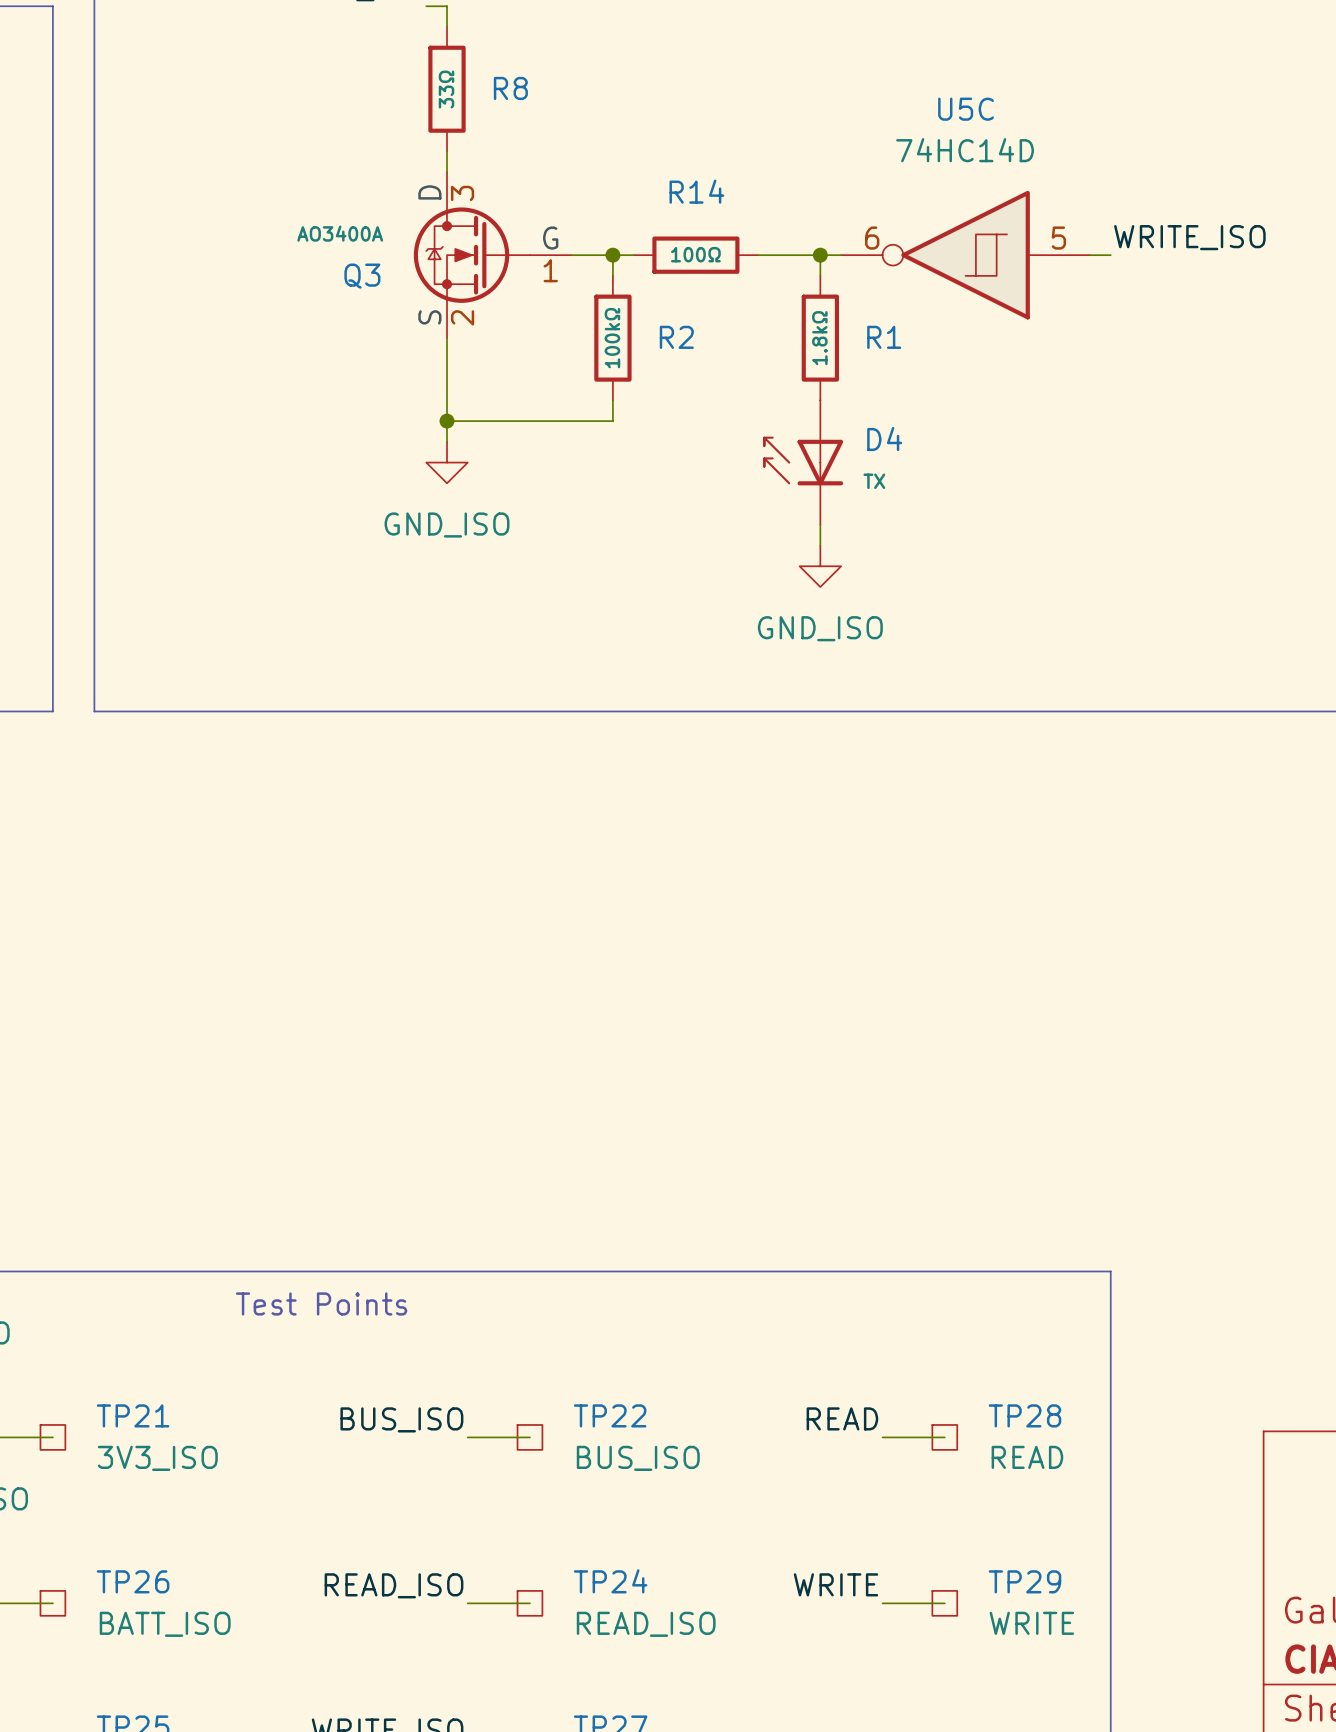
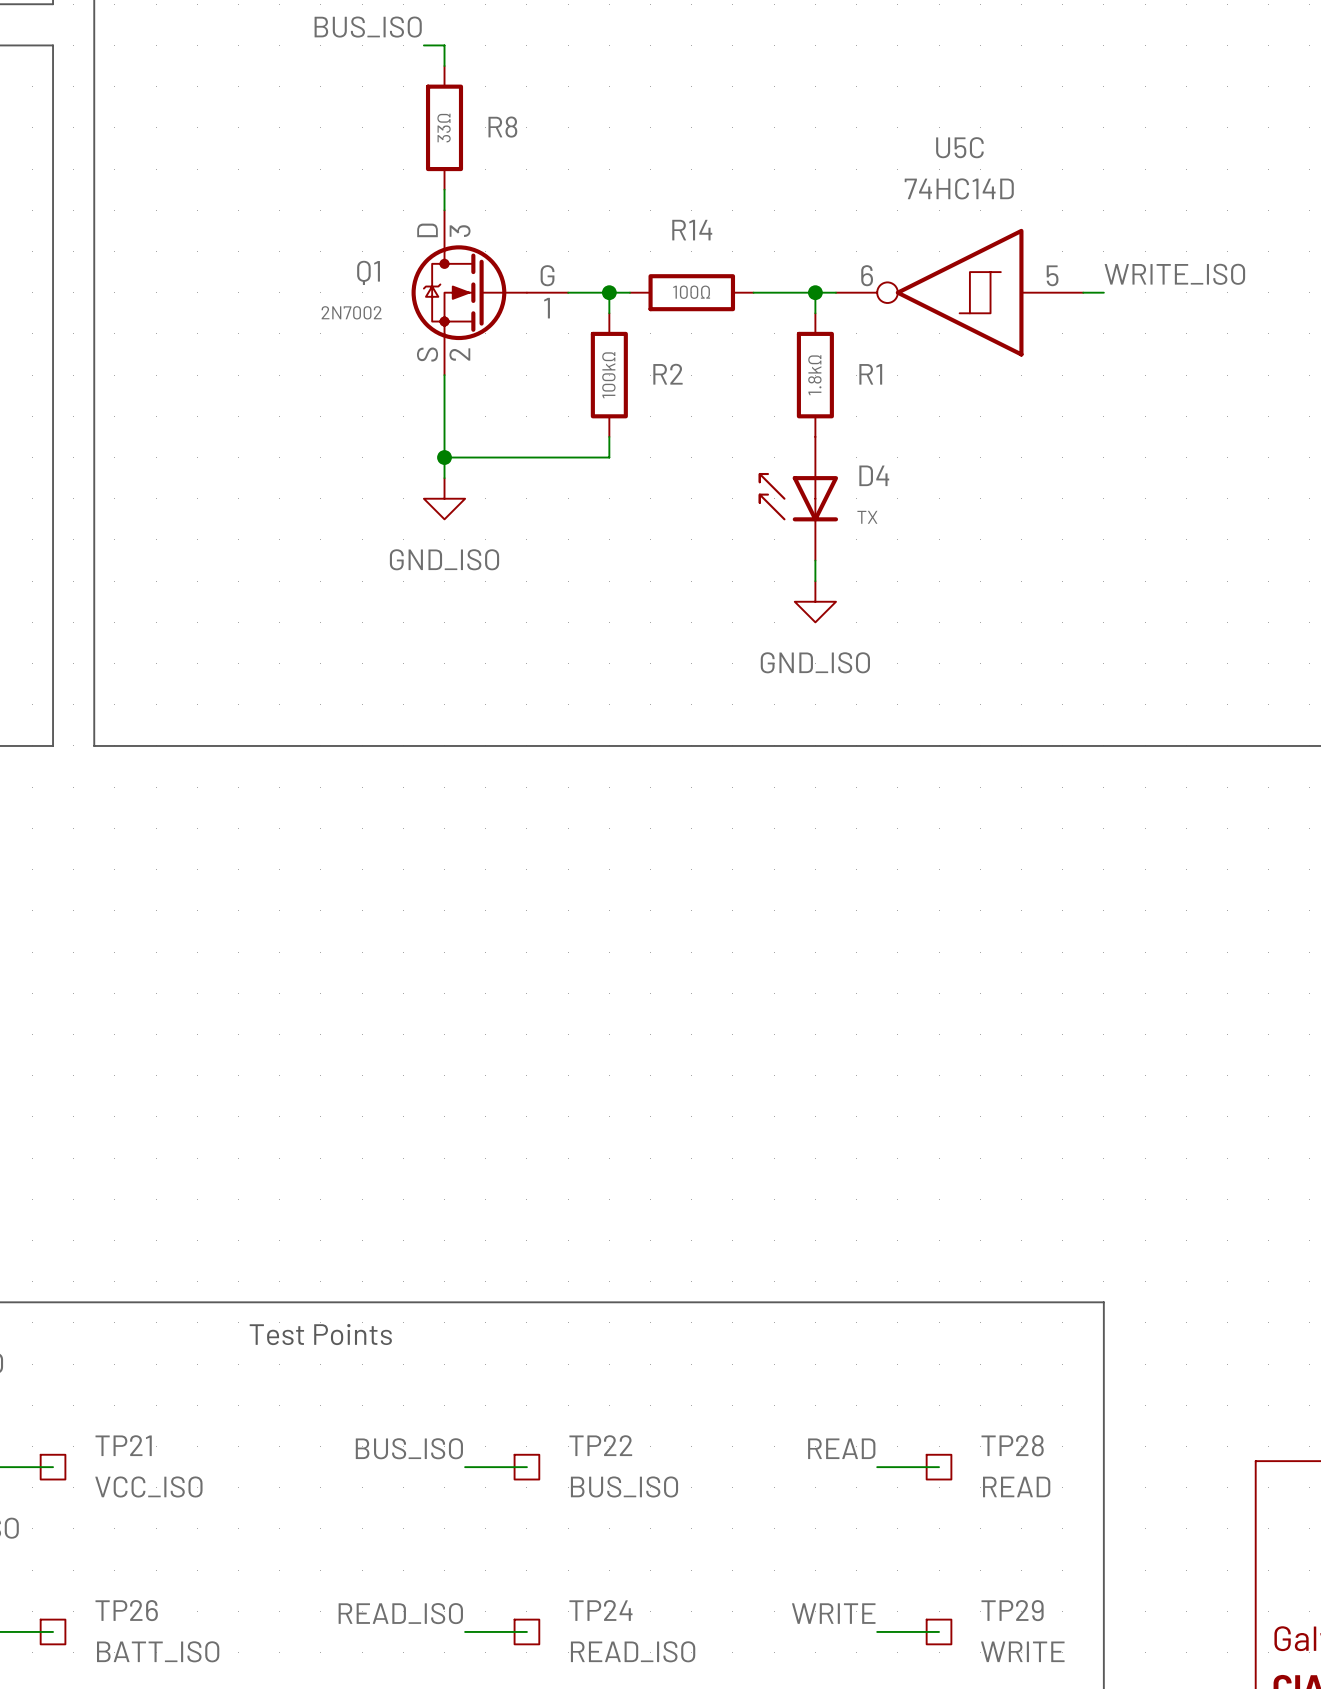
Q3 value: AO3400A (340, 233) -> 2N7002 (351, 312)
Q3 name: Q3 (362, 276) -> Q1 (368, 272)
TP21 value: 3V3_ISO (157, 1458) -> VCC_ISO (148, 1486)

